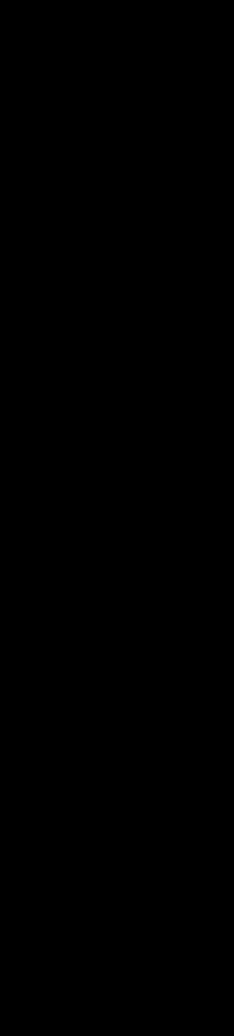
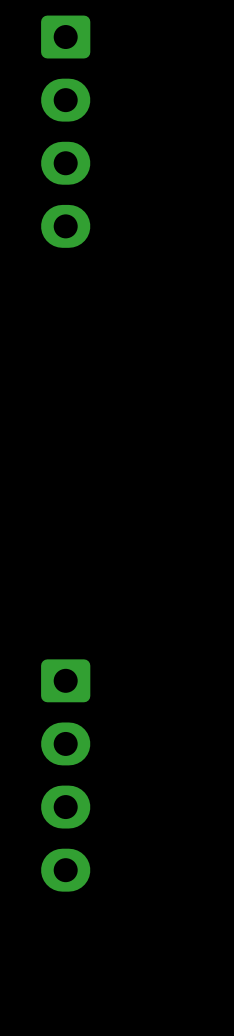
part: none -> (65, 131)
part: none -> (65, 775)

